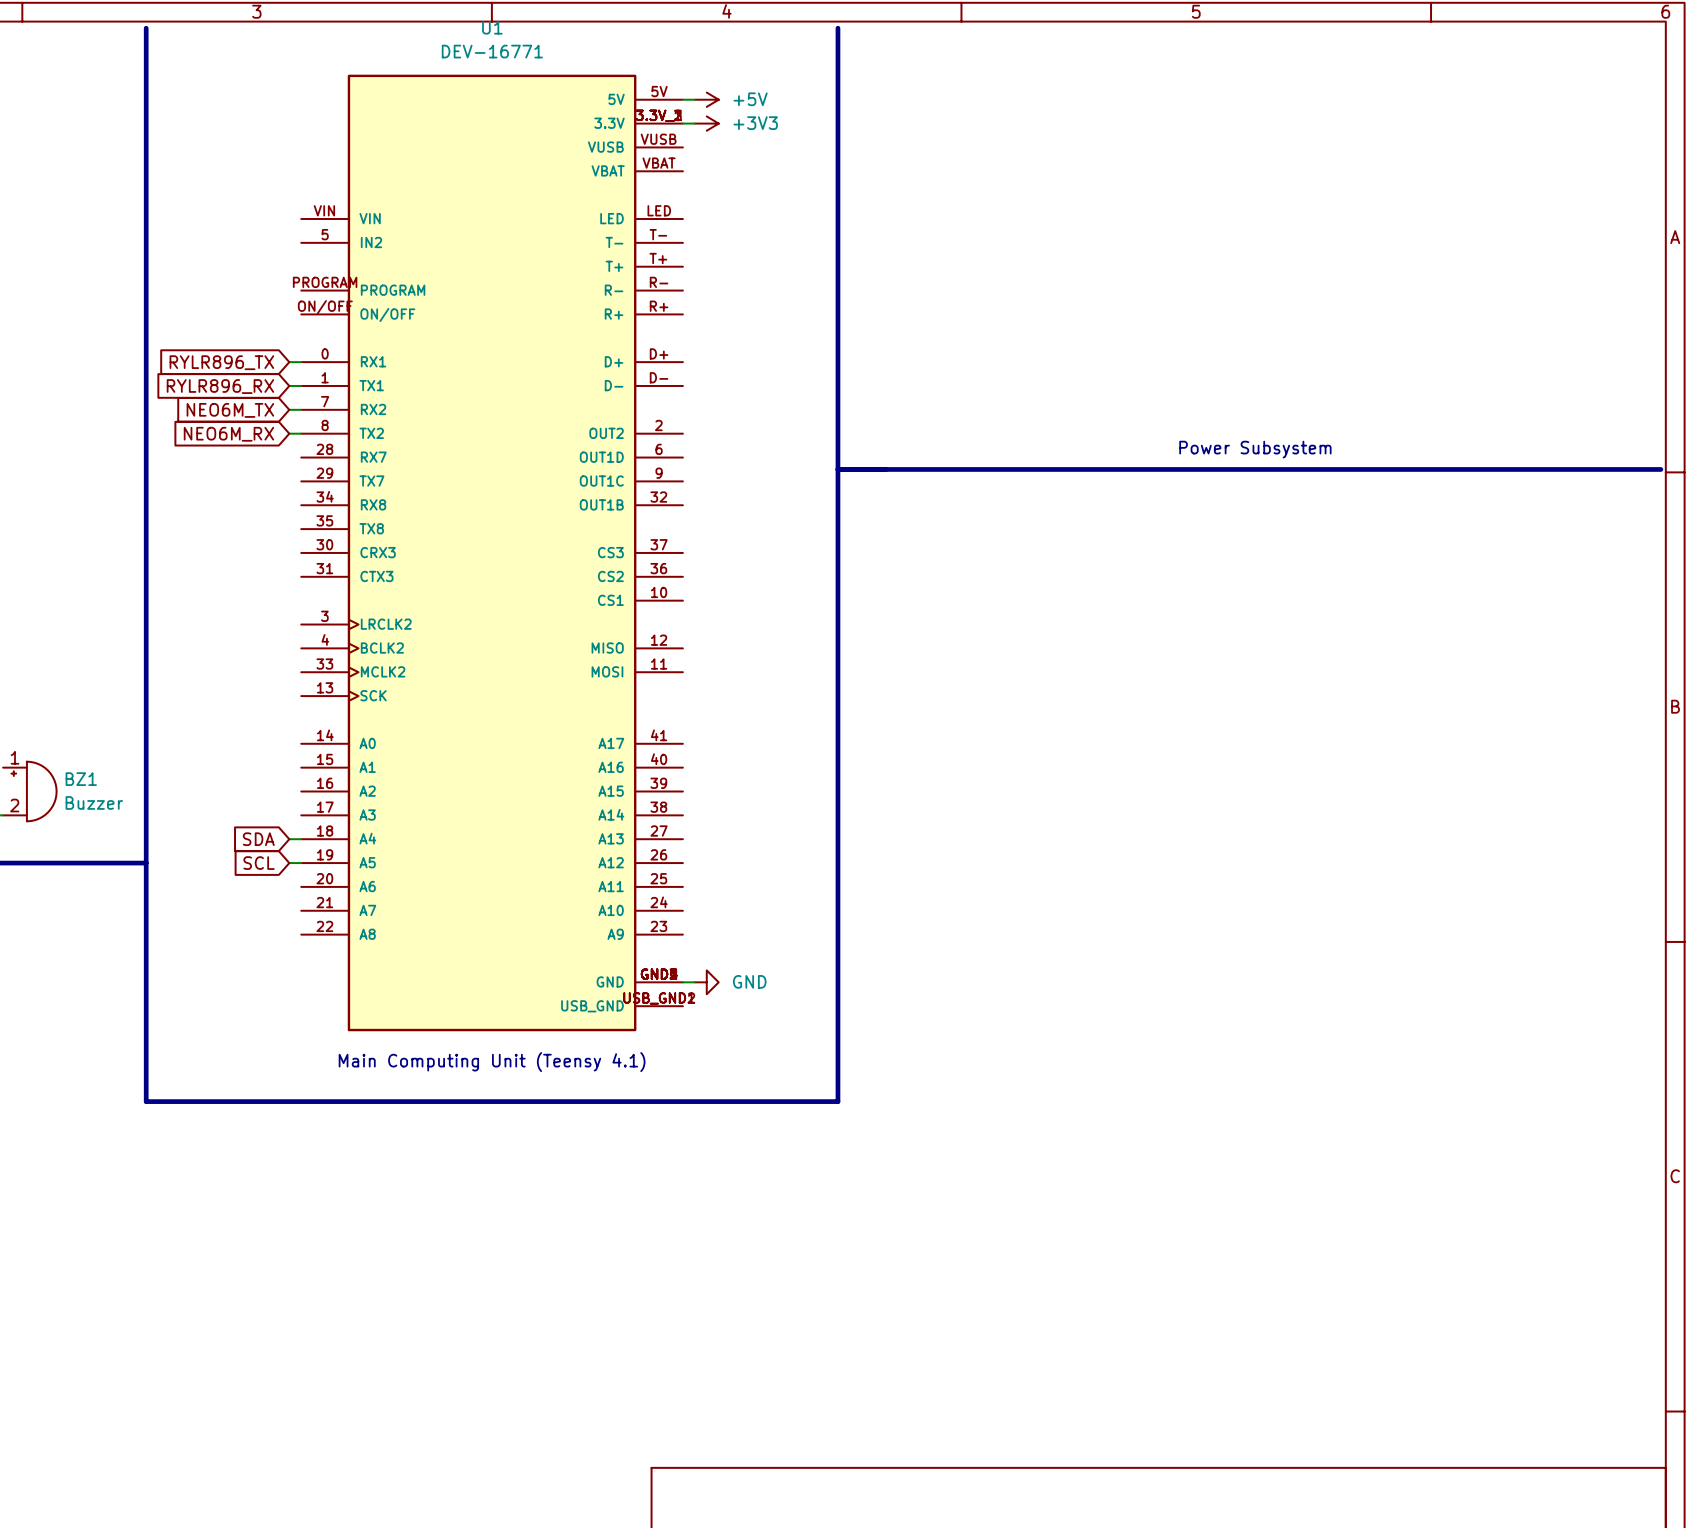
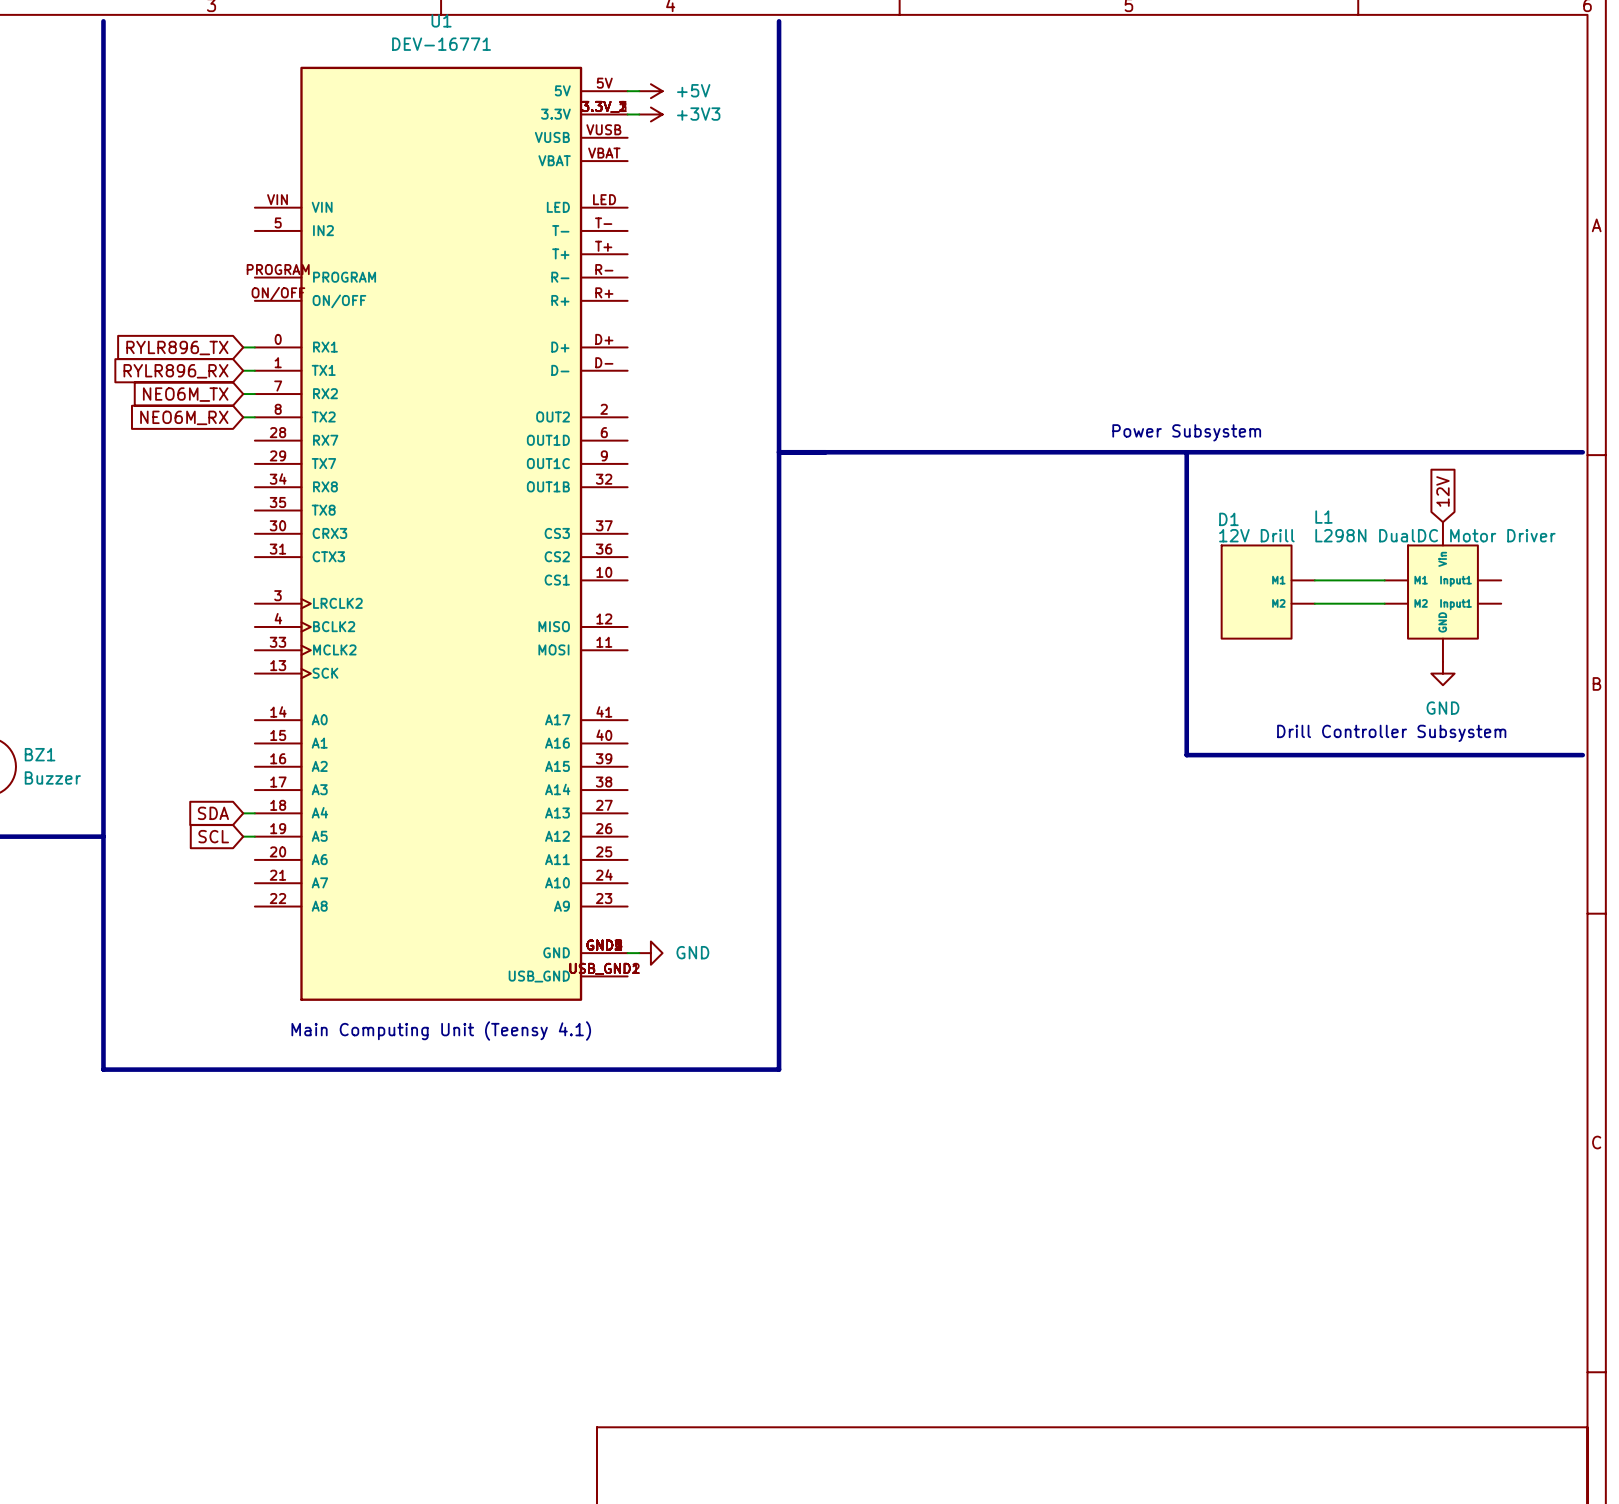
line: none -> (1186, 452) (1186, 755) (1582, 755)
global label: none -> 12V (1442, 491)
wire: none -> (1314, 580) (1384, 580)
D1: none -> 12V Drill (1268, 592)
L1: none -> L298N DualDC Motor Driver (1442, 592)
wire: none -> (1314, 603) (1384, 603)
power symbol: none -> GND (1442, 673)
text: none -> Drill Controller Subsystem (1391, 733)

